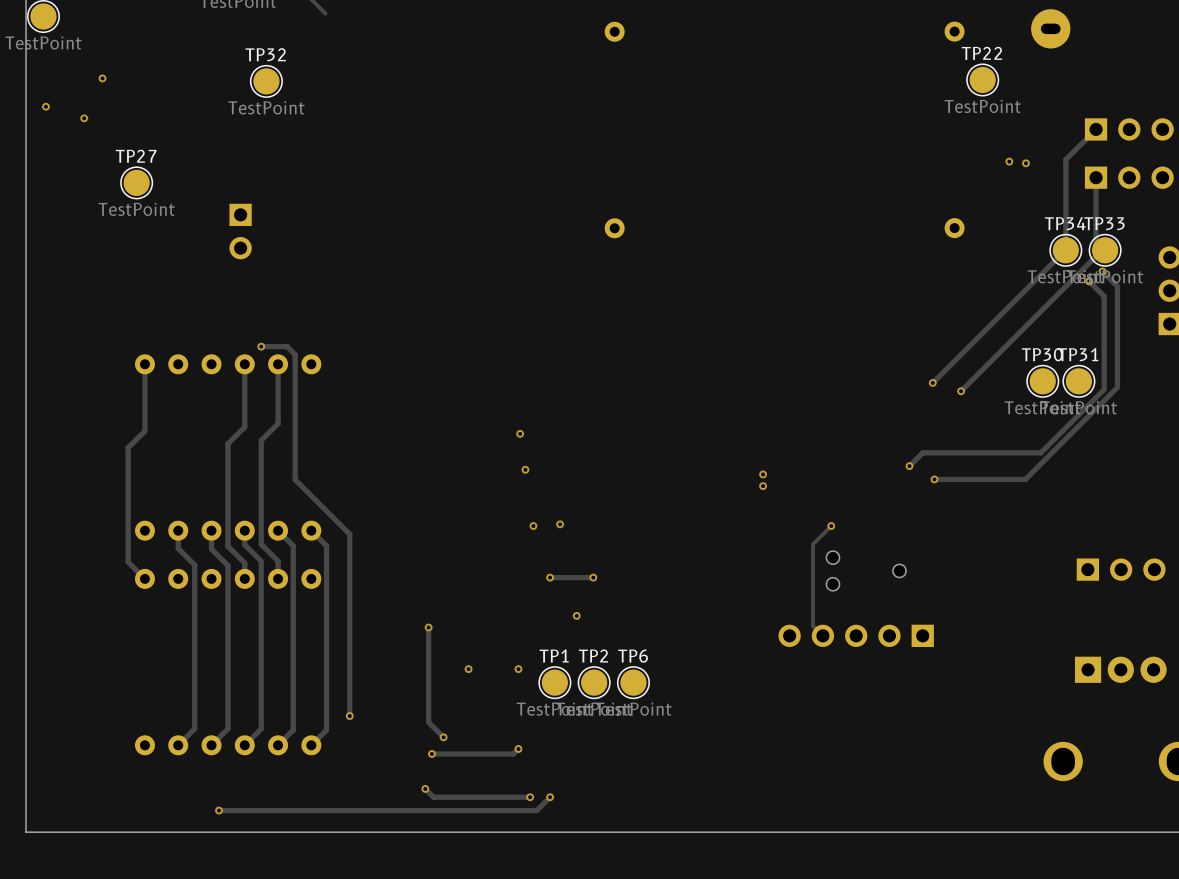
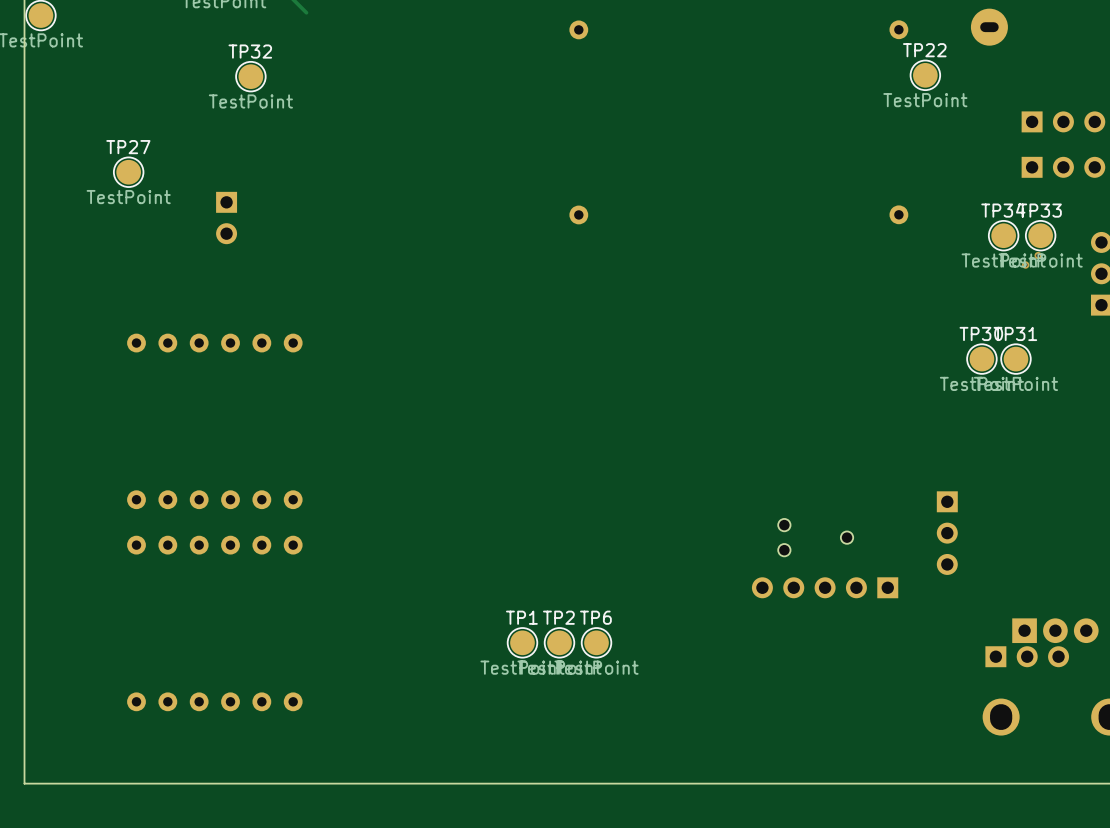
via: (102, 78) -> none
via: (45, 106) -> none
via: (84, 118) -> none
track: (1096, 129) (1065, 159) (1065, 249) (932, 382) -> none
via: (1009, 161) -> none
via: (1025, 163) -> none
track: (1096, 177) (1096, 256) (961, 391) -> none
track: (1102, 271) (1117, 286) (1117, 387) (1025, 479) (934, 479) -> none
track: (1089, 281) (1104, 296) (1104, 389) (1040, 452) (922, 452) (909, 466) -> none
track: (261, 346) (287, 346) (295, 354) (295, 479) (349, 534) (349, 716) -> none
via: (261, 346) -> none
track: (144, 364) (144, 430) (128, 447) (128, 562) (144, 578) -> none
track: (244, 364) (244, 427) (227, 443) (227, 546) (244, 563) (244, 578) -> none
track: (278, 364) (278, 423) (261, 440) (261, 544) (278, 561) (278, 578) -> none
via: (932, 382) -> none
via: (961, 391) -> none
via: (520, 433) -> none
via: (909, 466) -> none
via: (525, 469) -> none
via: (763, 474) -> none
via: (934, 479) -> none
via: (763, 486) -> none
via: (560, 524) -> none
via: (533, 526) -> none
track: (831, 526) (812, 544) (812, 625) (822, 635) -> none
via: (831, 526) -> none
track: (178, 530) (178, 548) (194, 564) (194, 728) (178, 745) -> none
track: (211, 530) (211, 549) (227, 565) (227, 728) (211, 745) -> none
track: (244, 530) (244, 544) (261, 561) (261, 728) (244, 745) -> none
track: (278, 530) (293, 545) (293, 730) (278, 745) -> none
track: (311, 530) (326, 545) (326, 730) (311, 745) -> none
part: none -> (947, 533)
part: (1121, 569) -> none
via: (550, 577) -> none
track: (593, 577) (550, 577) -> none
via: (593, 577) -> none
via: (576, 615) -> none
track: (428, 627) (428, 722) (443, 737) -> none
via: (428, 627) -> none
part position: (856, 635) -> (825, 587)
via: (468, 669) -> none
via: (518, 669) -> none
part: none -> (1027, 656)
via: (349, 716) -> none
via: (443, 737) -> none
track: (518, 748) (513, 753) (431, 753) -> none
via: (518, 748) -> none
via: (431, 753) -> none
track: (425, 788) (433, 797) (530, 797) -> none
via: (425, 788) -> none
via: (530, 797) -> none
track: (550, 797) (536, 810) (218, 810) -> none
via: (550, 797) -> none
via: (218, 810) -> none

